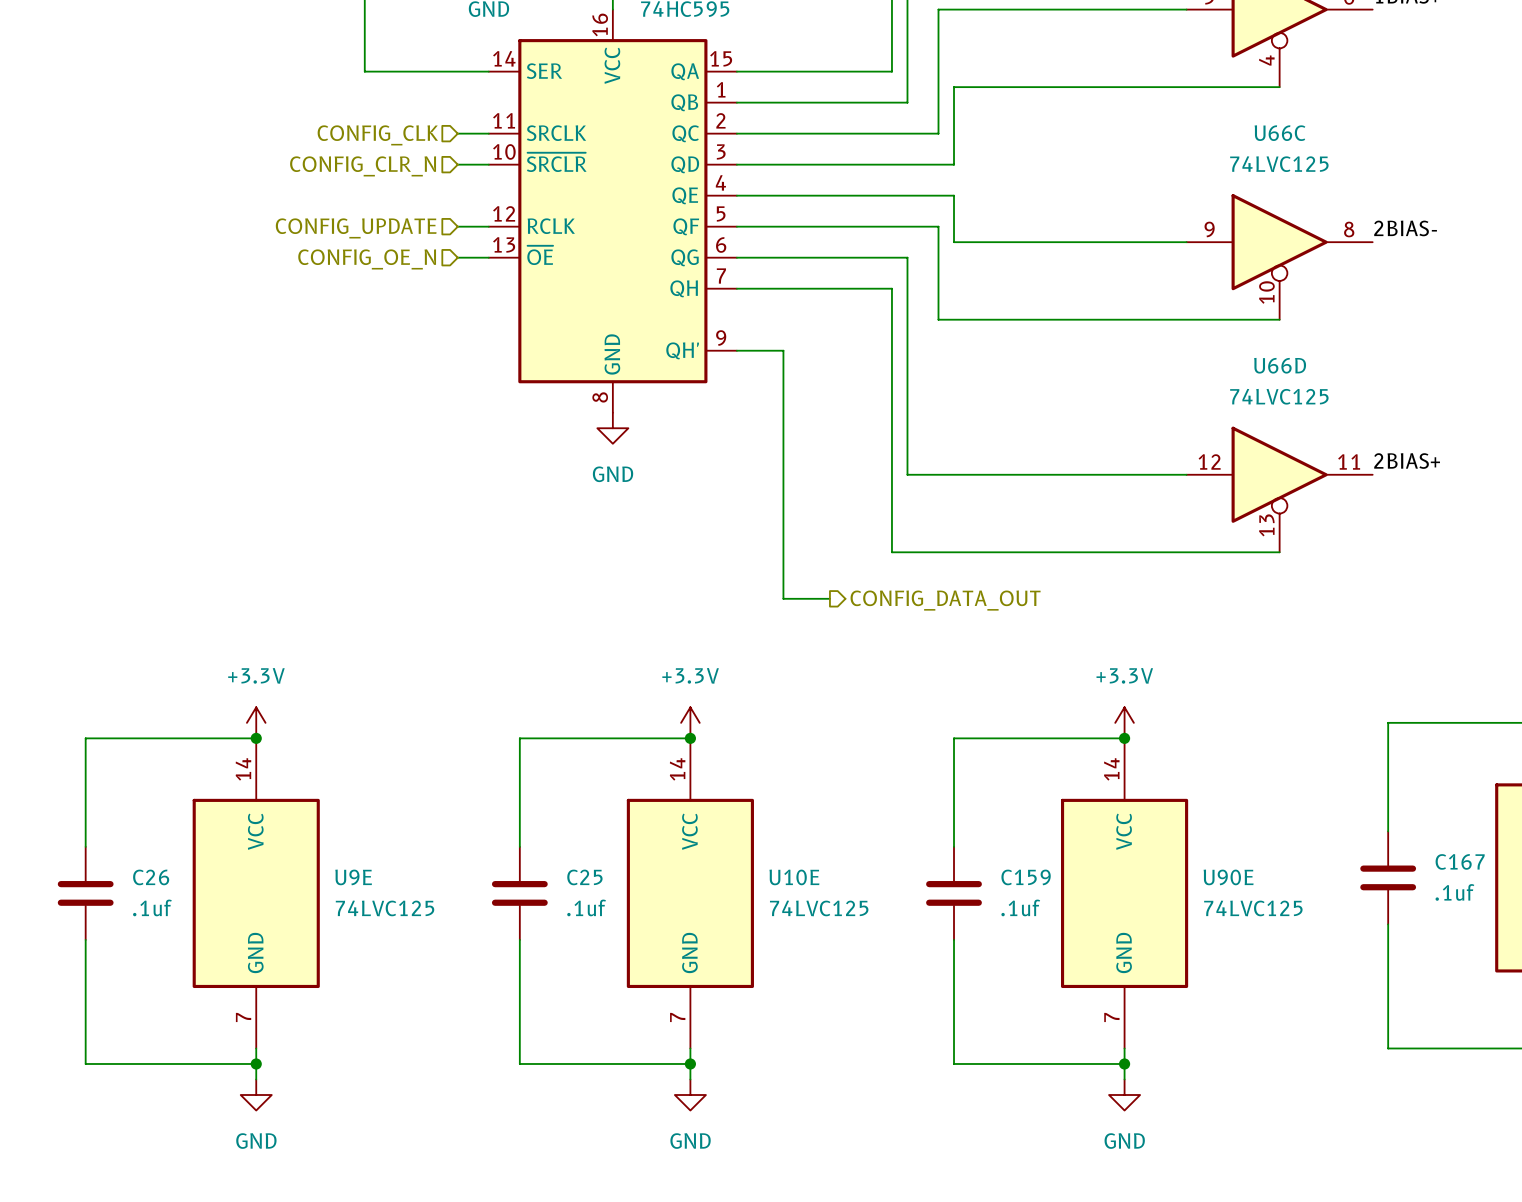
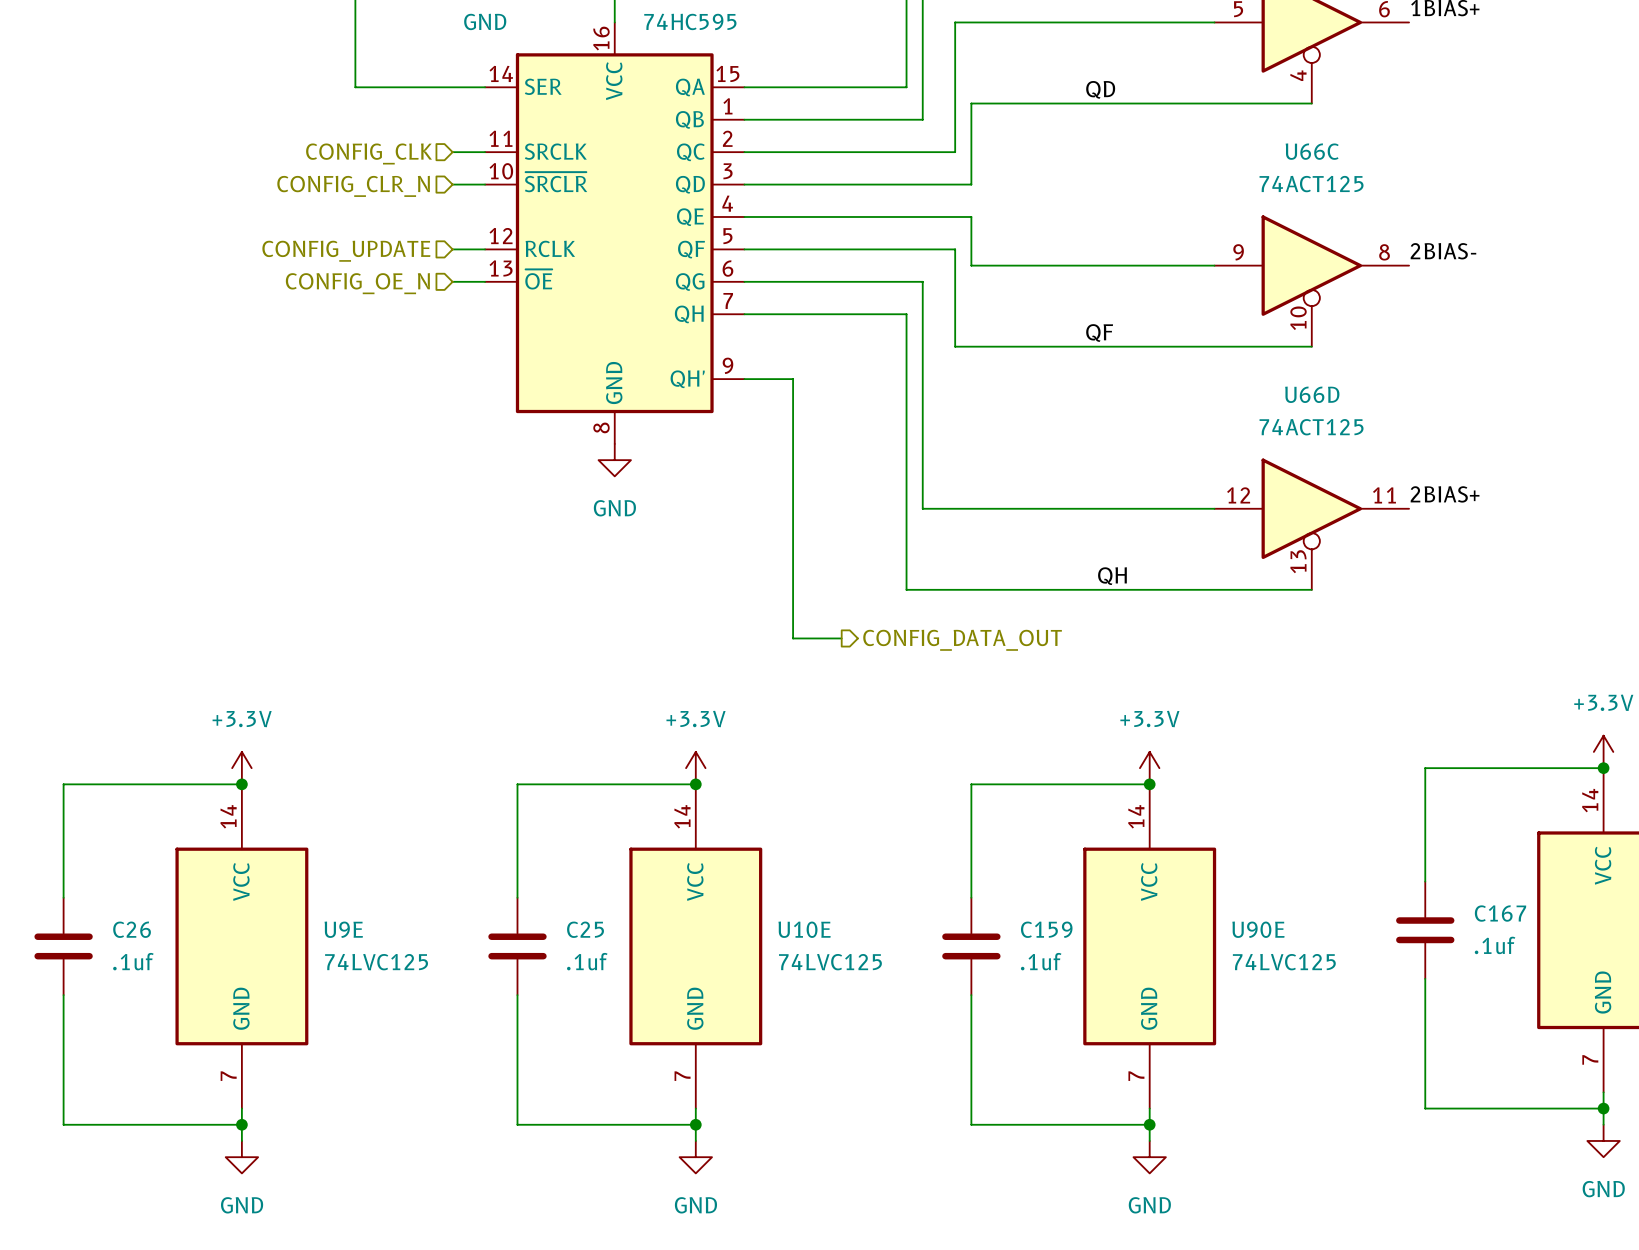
label: none -> QD (1100, 89)
U66C value: 74LVC125 (1279, 164) -> 74ACT125 (1311, 184)
label: none -> QF (1099, 333)
U66D value: 74LVC125 (1279, 396) -> 74ACT125 (1311, 427)
label: none -> QH (1112, 576)

